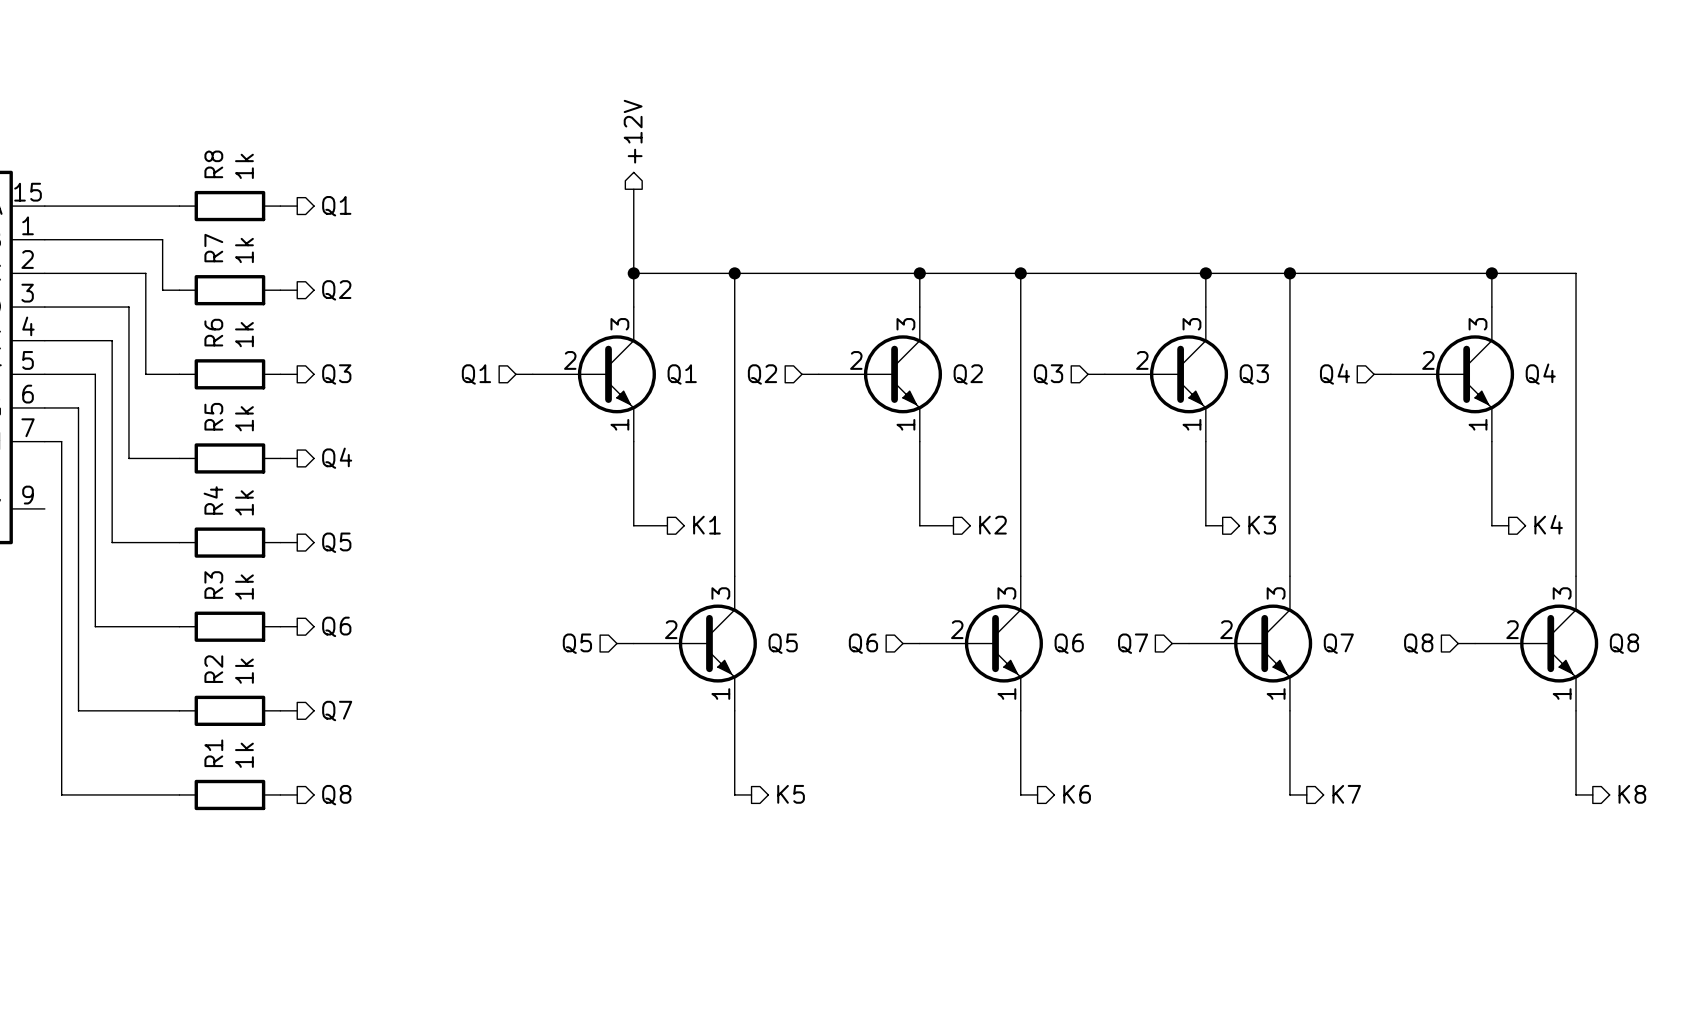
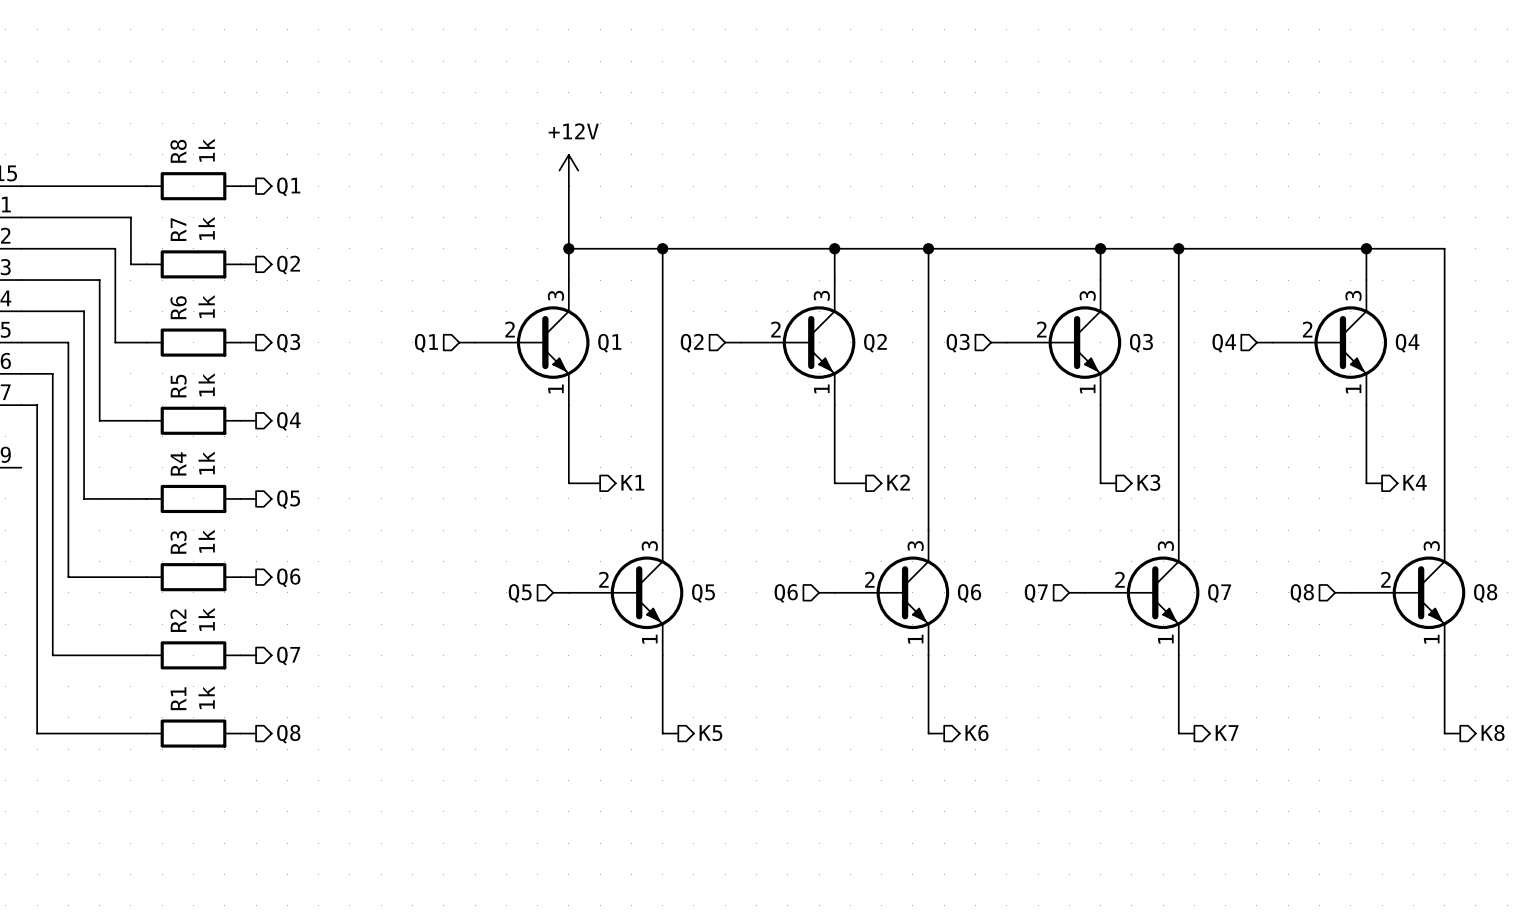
hierarchical label: +12V (633, 131) -> none
power symbol: none -> +12V (568, 170)

